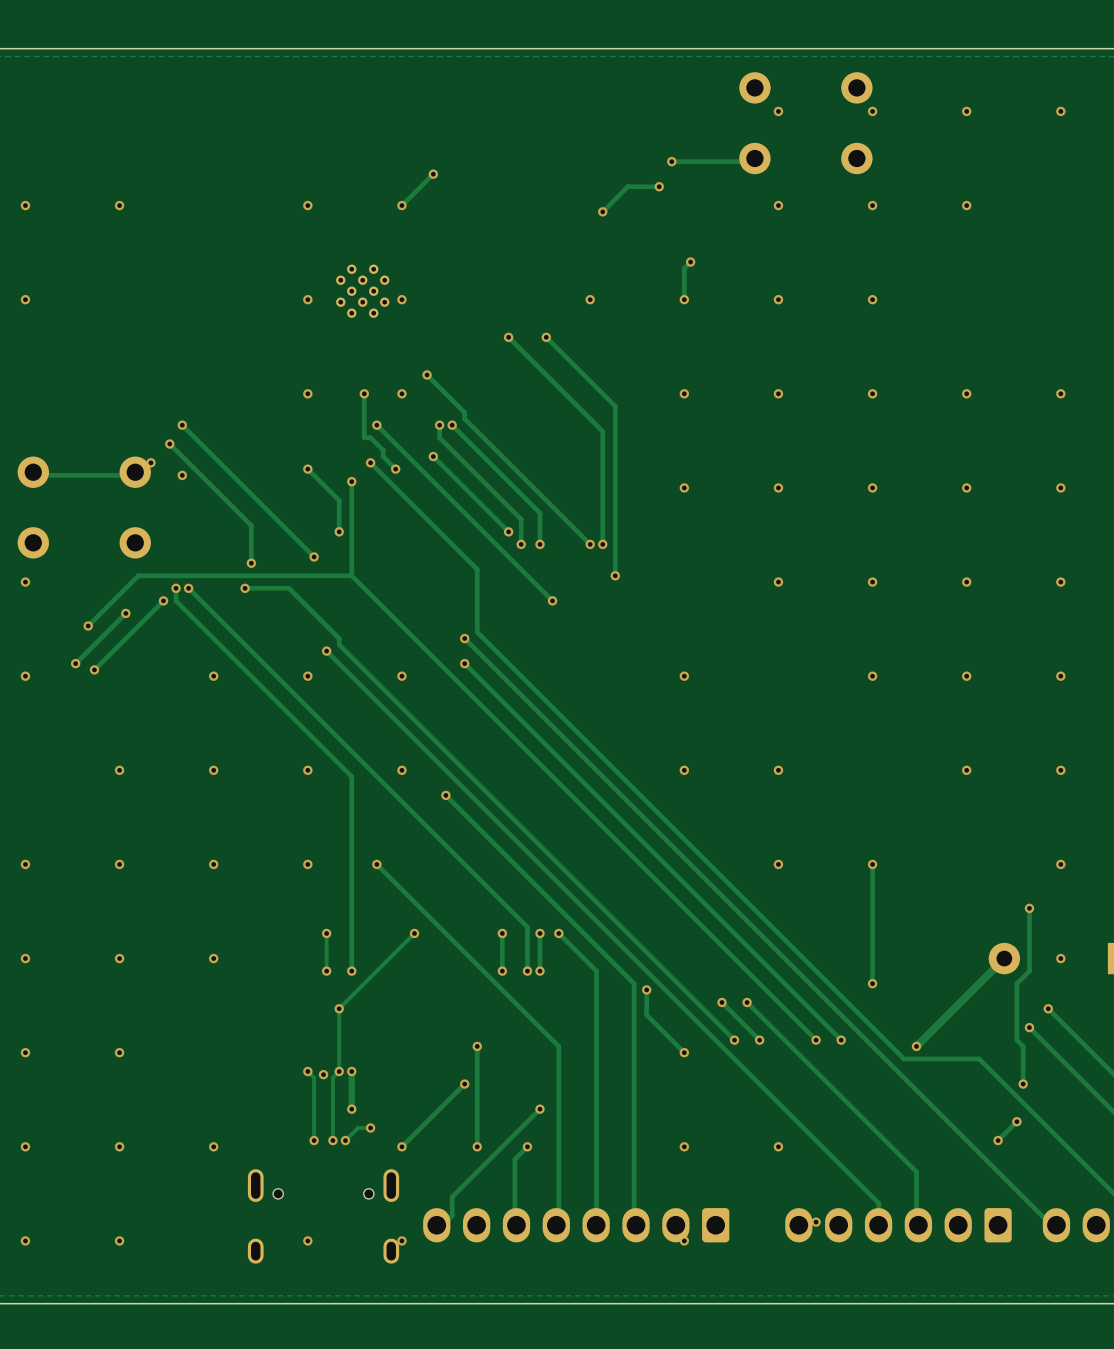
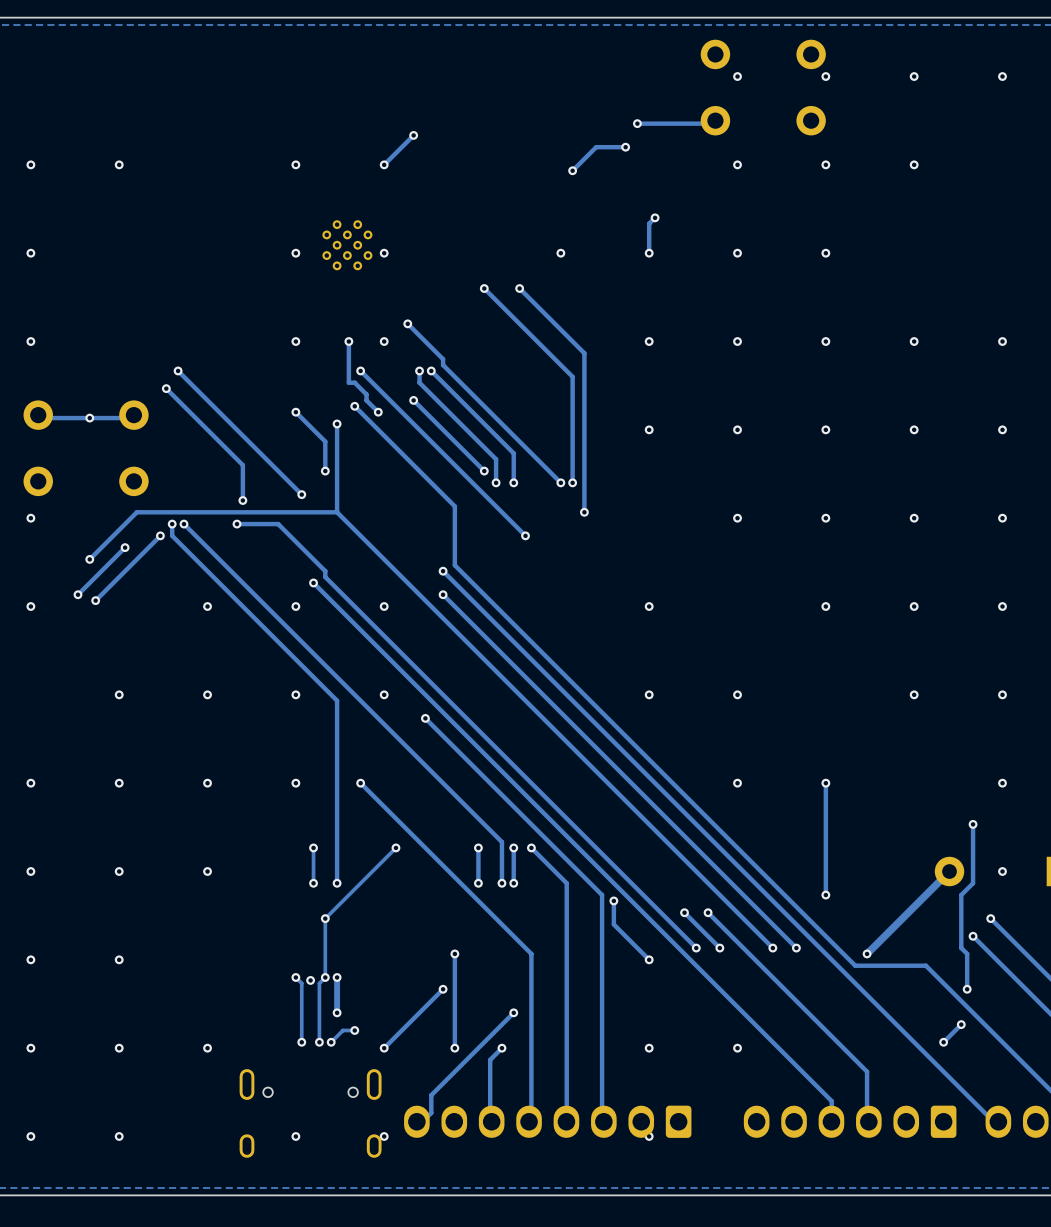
via: none -> (30, 341)
via: (150, 462) -> none
via: none -> (89, 418)
via: (182, 475) -> none
via: (816, 1222) -> none

